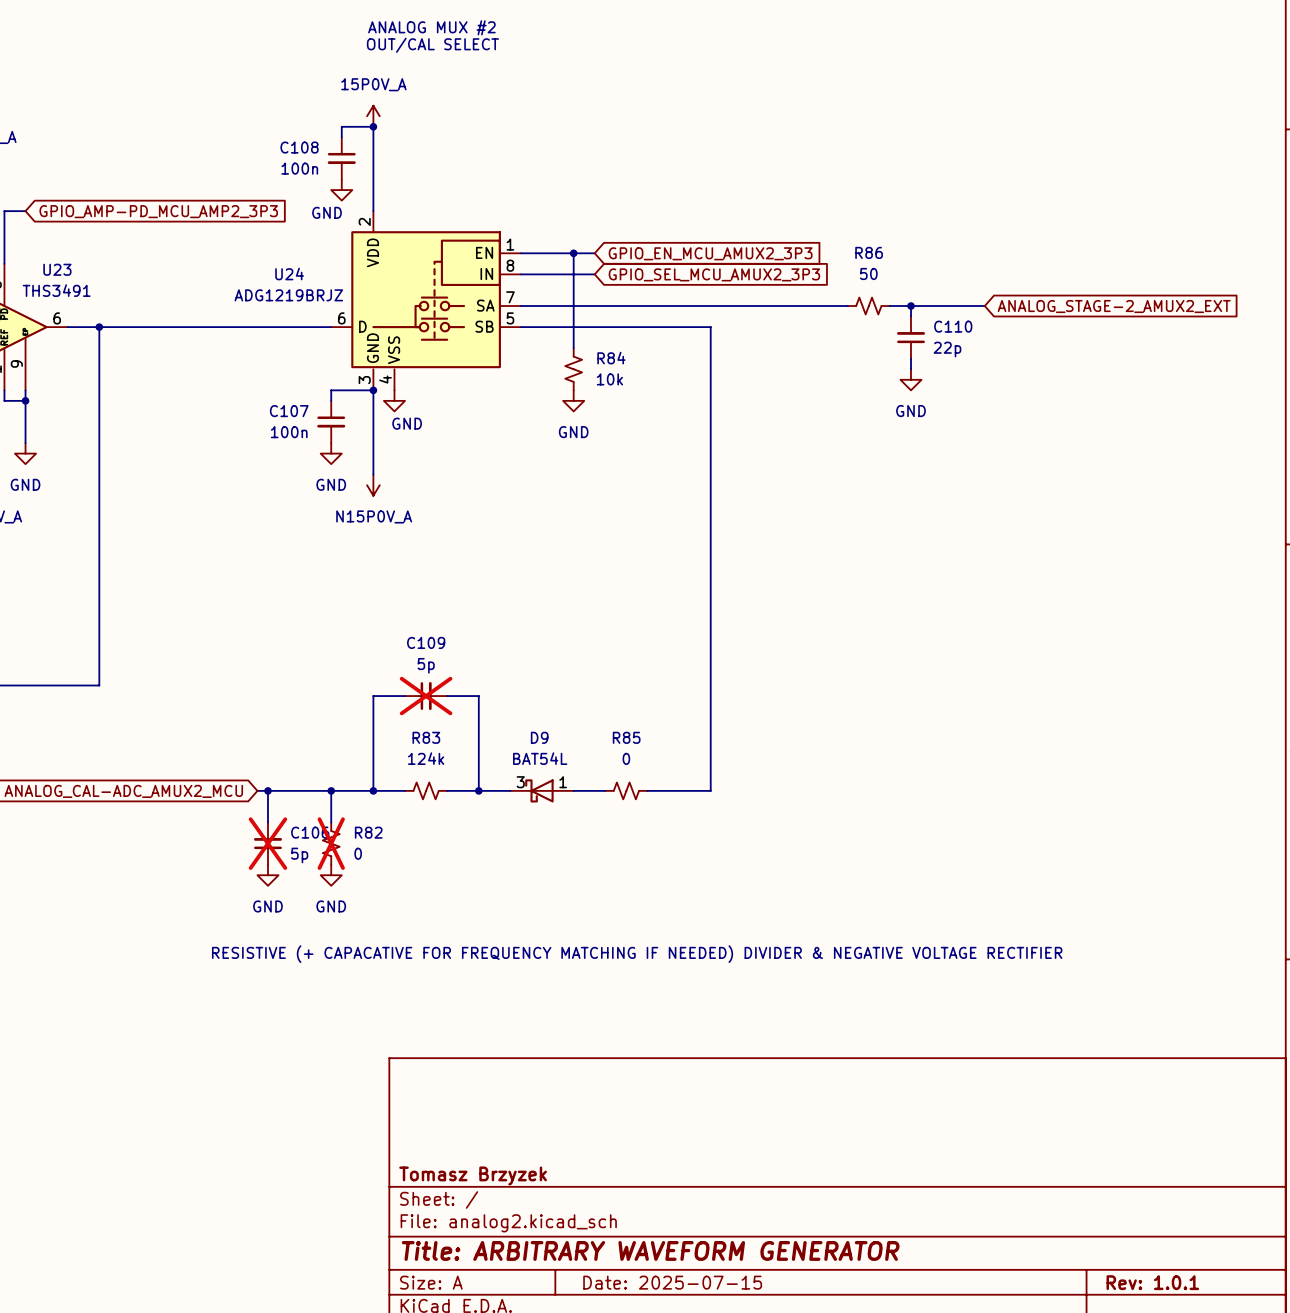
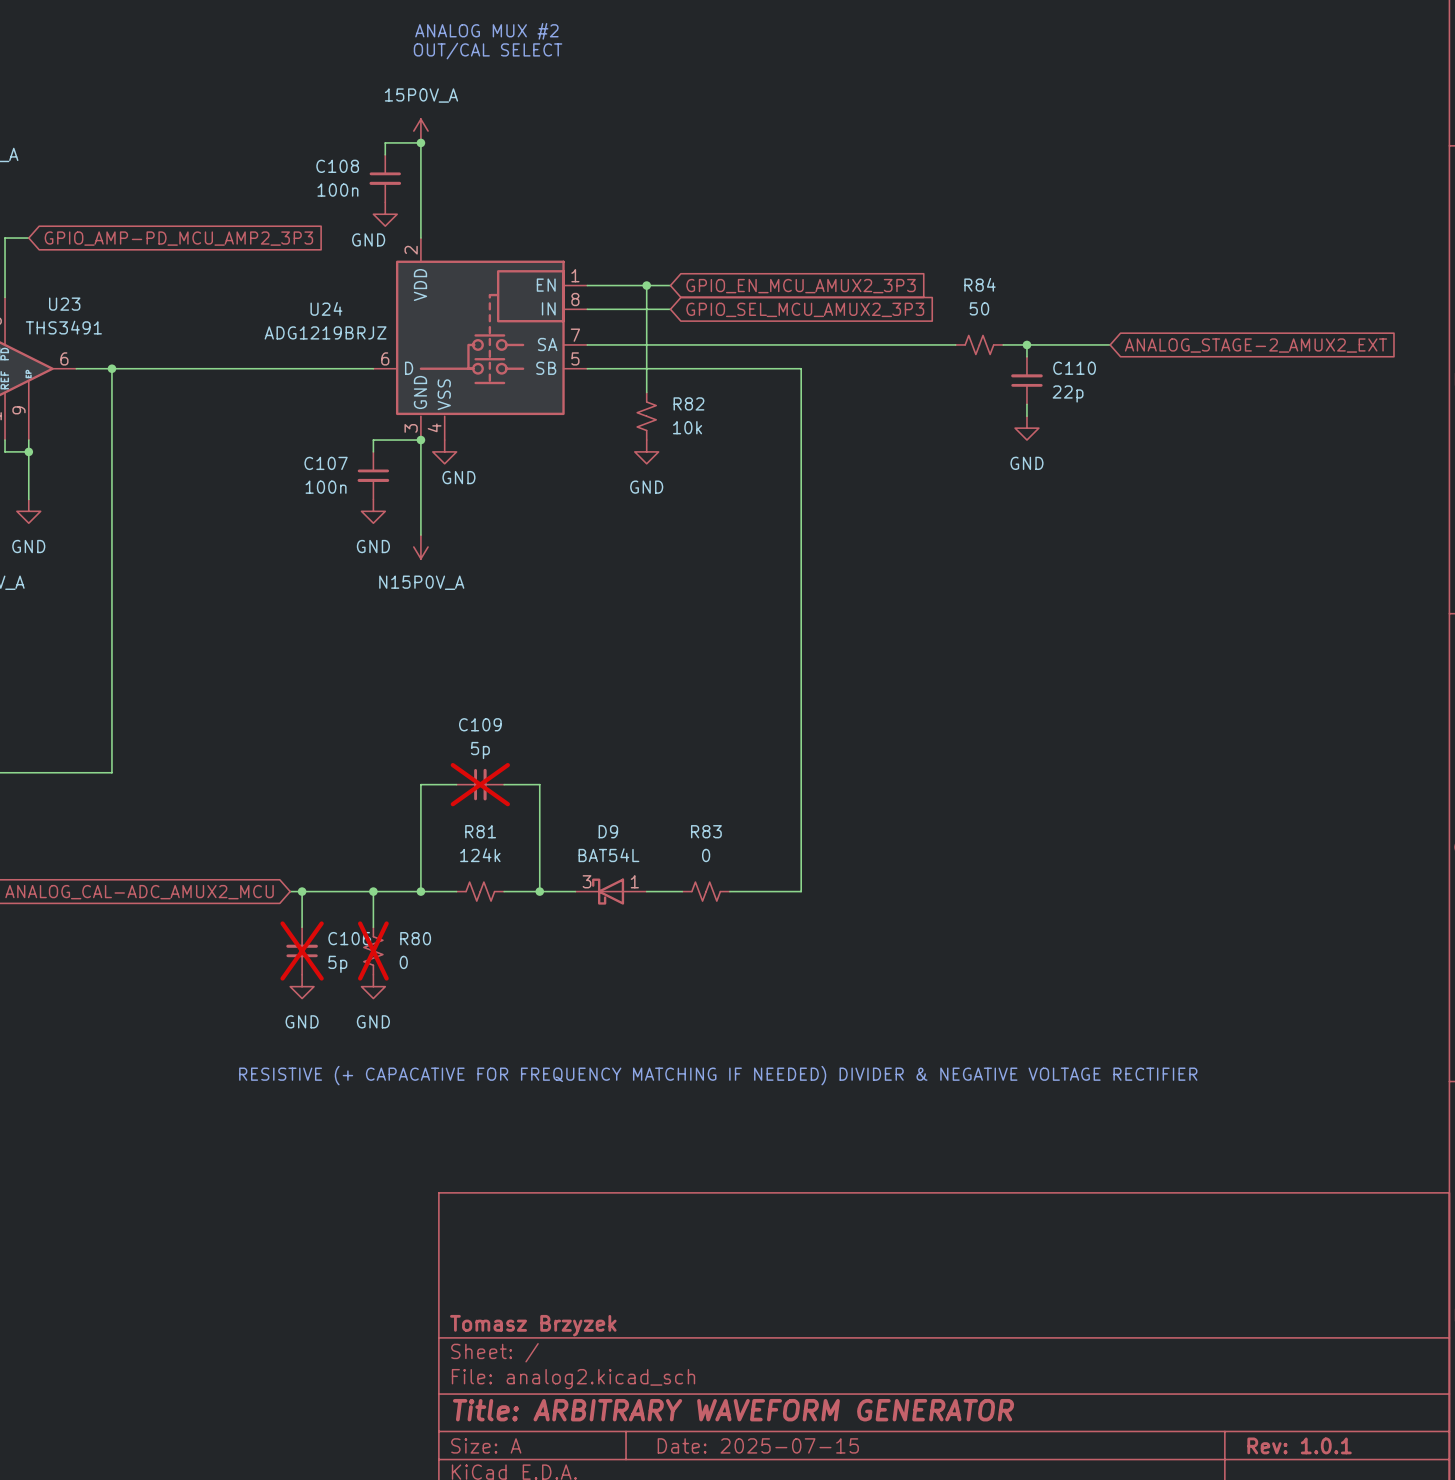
R86 name: R86 (869, 252) -> R84 (980, 284)
R84 name: R84 (611, 358) -> R82 (688, 403)
R83 name: R83 (426, 737) -> R81 (480, 831)
R85 name: R85 (626, 737) -> R83 (706, 831)
R82 name: R82 (368, 832) -> R80 (415, 938)

